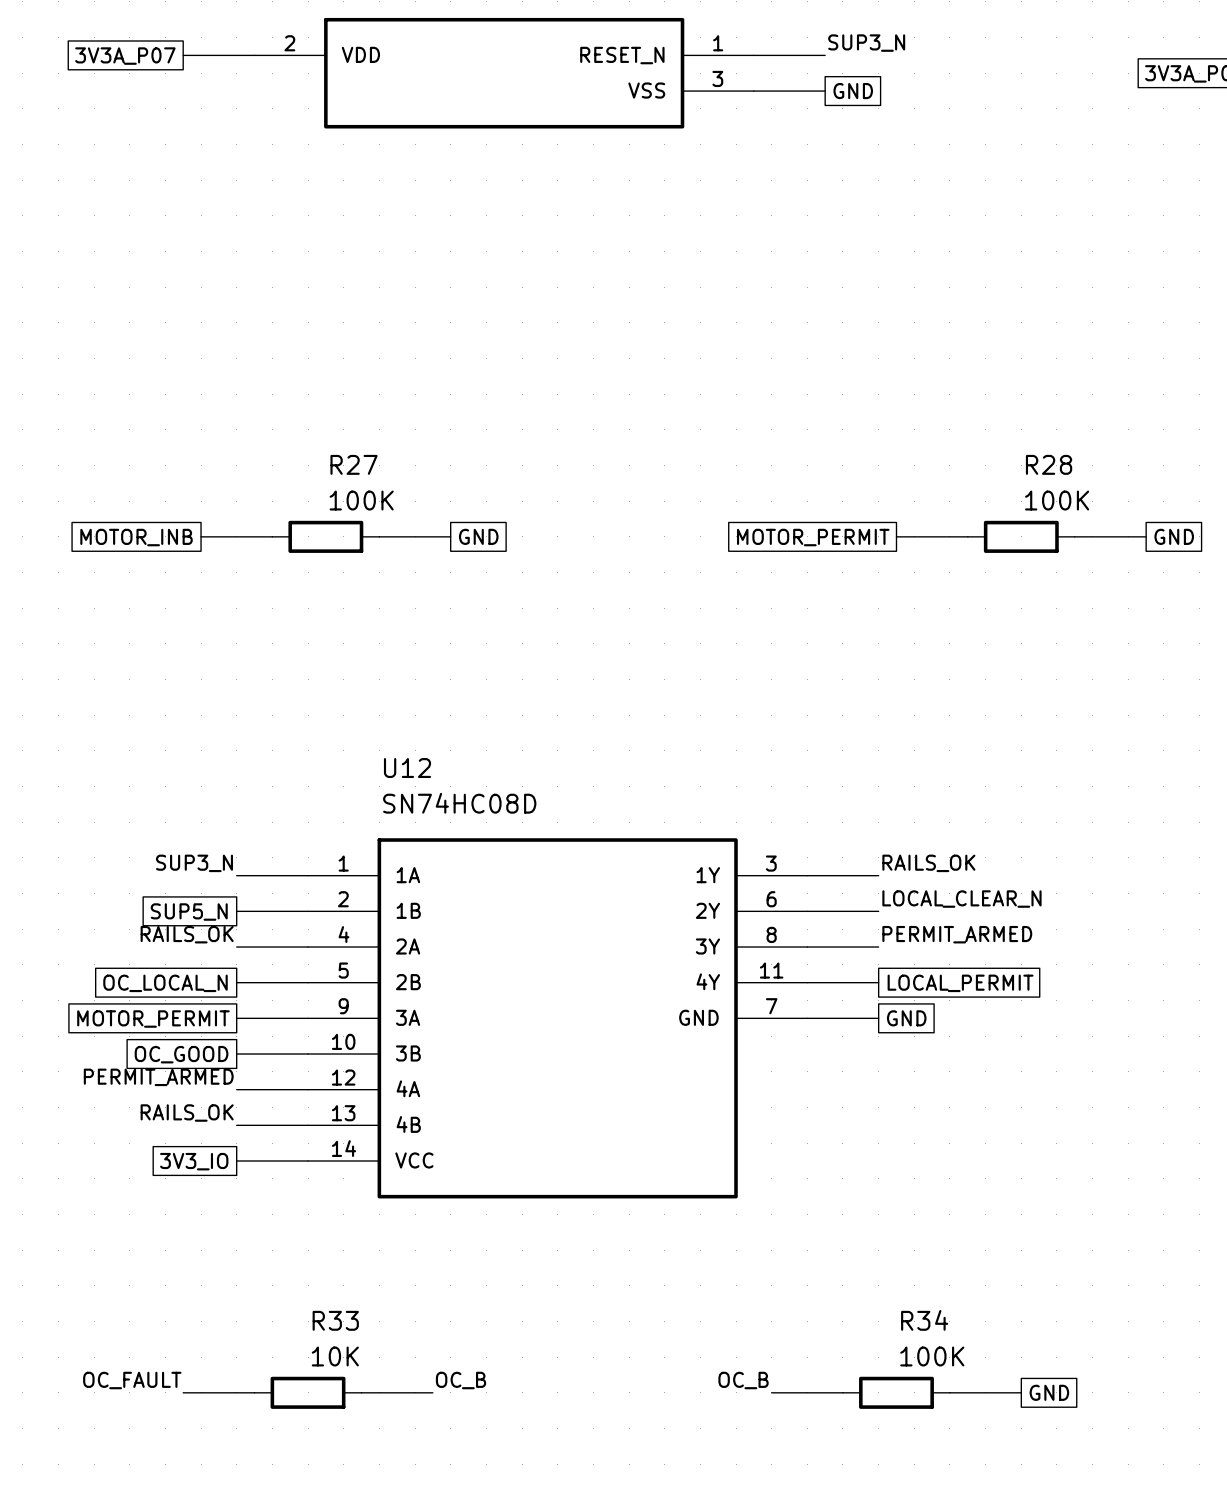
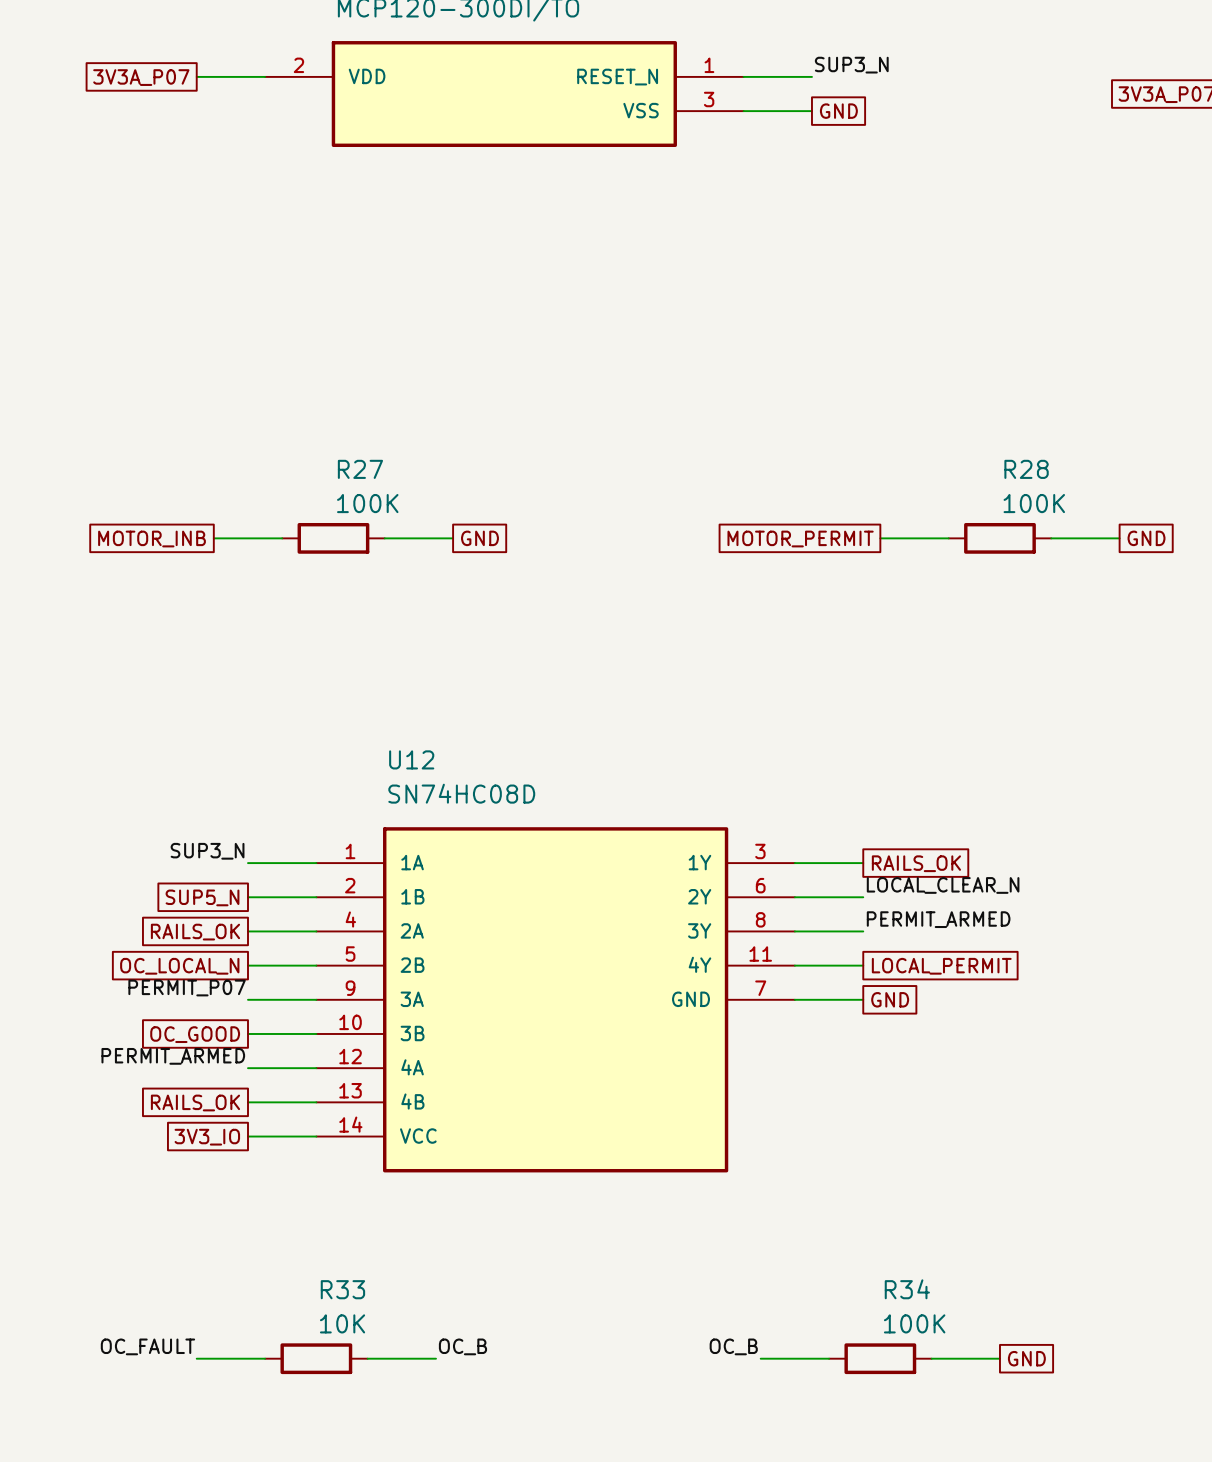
label: RAILS_OK (928, 863) -> none
global label: none -> RAILS_OK (916, 863)
label: RAILS_OK (187, 934) -> none
global label: none -> RAILS_OK (195, 932)
label: none -> PERMIT_P07 (187, 988)
global label: MOTOR_PERMIT (153, 1019) -> none
label: RAILS_OK (187, 1113) -> none
global label: none -> RAILS_OK (195, 1102)

